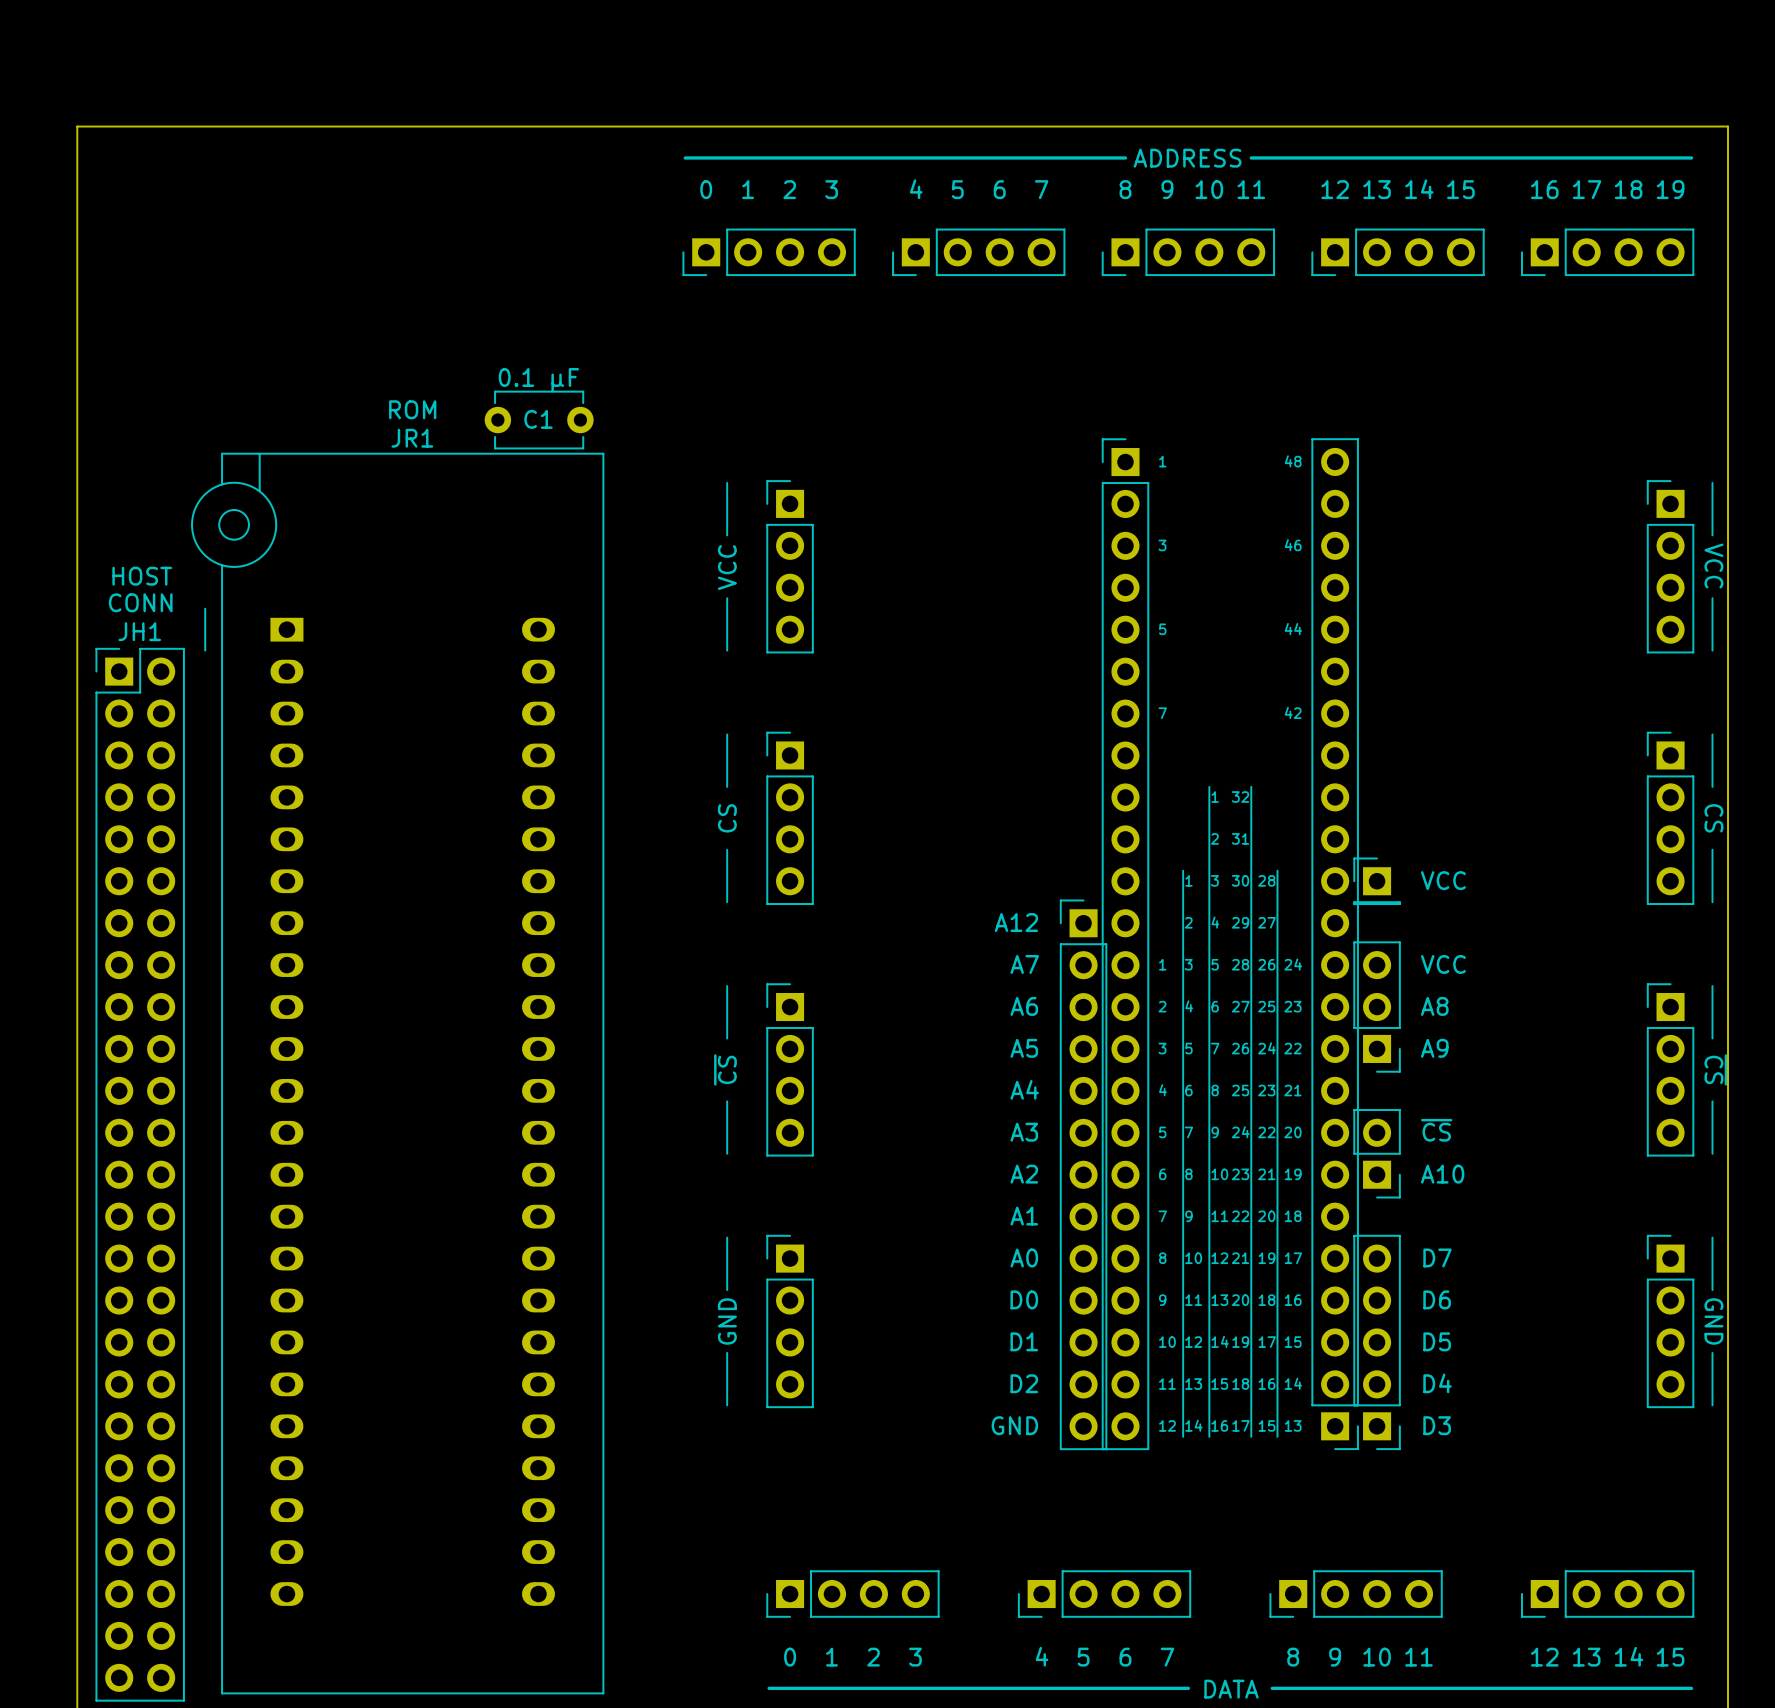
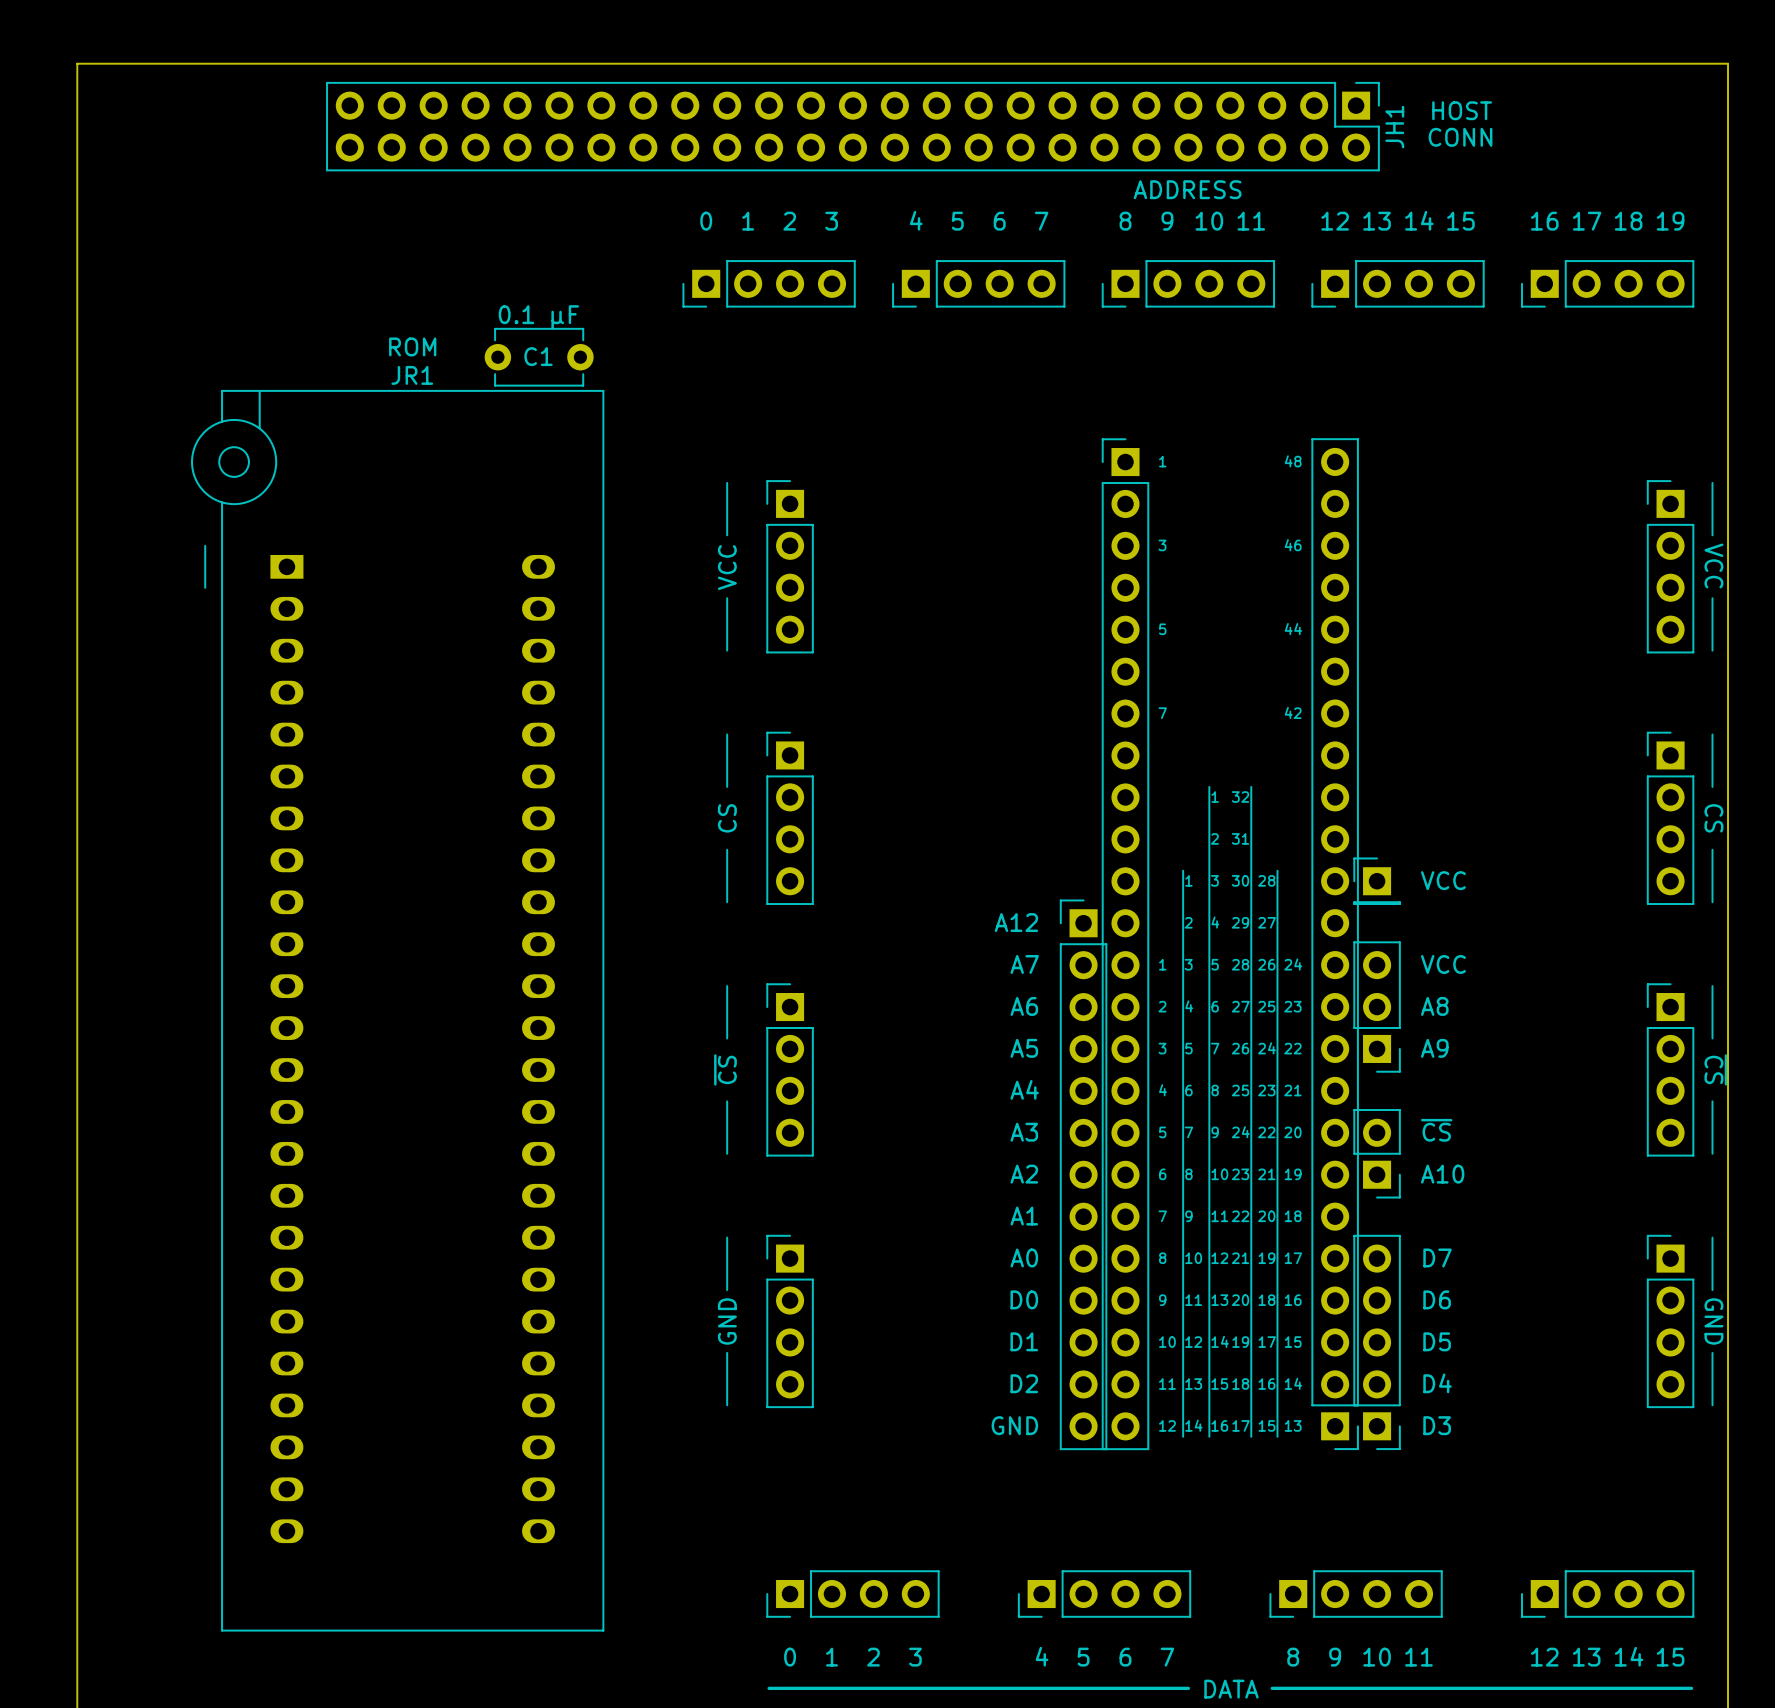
text: none -> HOST (1462, 110)
board edge: (77, 126) (1728, 126) -> (77, 126) (77, 63) (1728, 63) (1728, 126)
text: none -> CONN (1460, 137)
line: (685, 157) (1125, 157) -> none
line: (1251, 157) (1691, 157) -> none
text position: ADDRESS (1187, 158) -> ADDRESS (1187, 189)
text position: 0 (706, 189) -> 0 (706, 221)
text position: 1 (748, 189) -> 1 (748, 221)
text position: 2 (789, 189) -> 2 (789, 221)
text position: 3 (831, 189) -> 3 (831, 221)
text position: 4 (916, 189) -> 4 (916, 220)
text position: 5 (957, 189) -> 5 (957, 221)
text position: 6 (999, 189) -> 6 (999, 221)
text position: 7 (1041, 189) -> 7 (1041, 221)
text position: 8 (1125, 189) -> 8 (1125, 221)
text position: 9 (1167, 189) -> 9 (1167, 221)
text position: 10 (1209, 189) -> 10 (1209, 221)
text position: 11 (1251, 189) -> 11 (1251, 221)
text position: 12 (1335, 189) -> 12 (1335, 221)
text position: 13 (1377, 189) -> 13 (1377, 221)
text position: 14 (1419, 189) -> 14 (1419, 220)
text position: 15 (1460, 189) -> 15 (1460, 221)
text position: 16 (1544, 189) -> 16 (1544, 221)
text position: 17 (1587, 189) -> 17 (1587, 221)
text position: 18 (1628, 189) -> 18 (1628, 221)
text position: 19 (1670, 189) -> 19 (1670, 221)
part position: (769, 252) -> (769, 283)
part position: (978, 252) -> (978, 283)
part position: (1188, 252) -> (1188, 283)
part position: (1398, 252) -> (1398, 283)
part position: (1607, 252) -> (1607, 283)
text position: ROM (412, 409) -> ROM (412, 346)
C1 position: (539, 420) -> (539, 357)
text: HOST (142, 576) -> none
text: CONN (140, 602) -> none
JR1 position: (397, 1073) -> (397, 1010)
JH1 rotation: 0° (140, 1174) -> 90° clockwise (852, 126)
JH1 position: (140, 1174) -> (852, 126)

